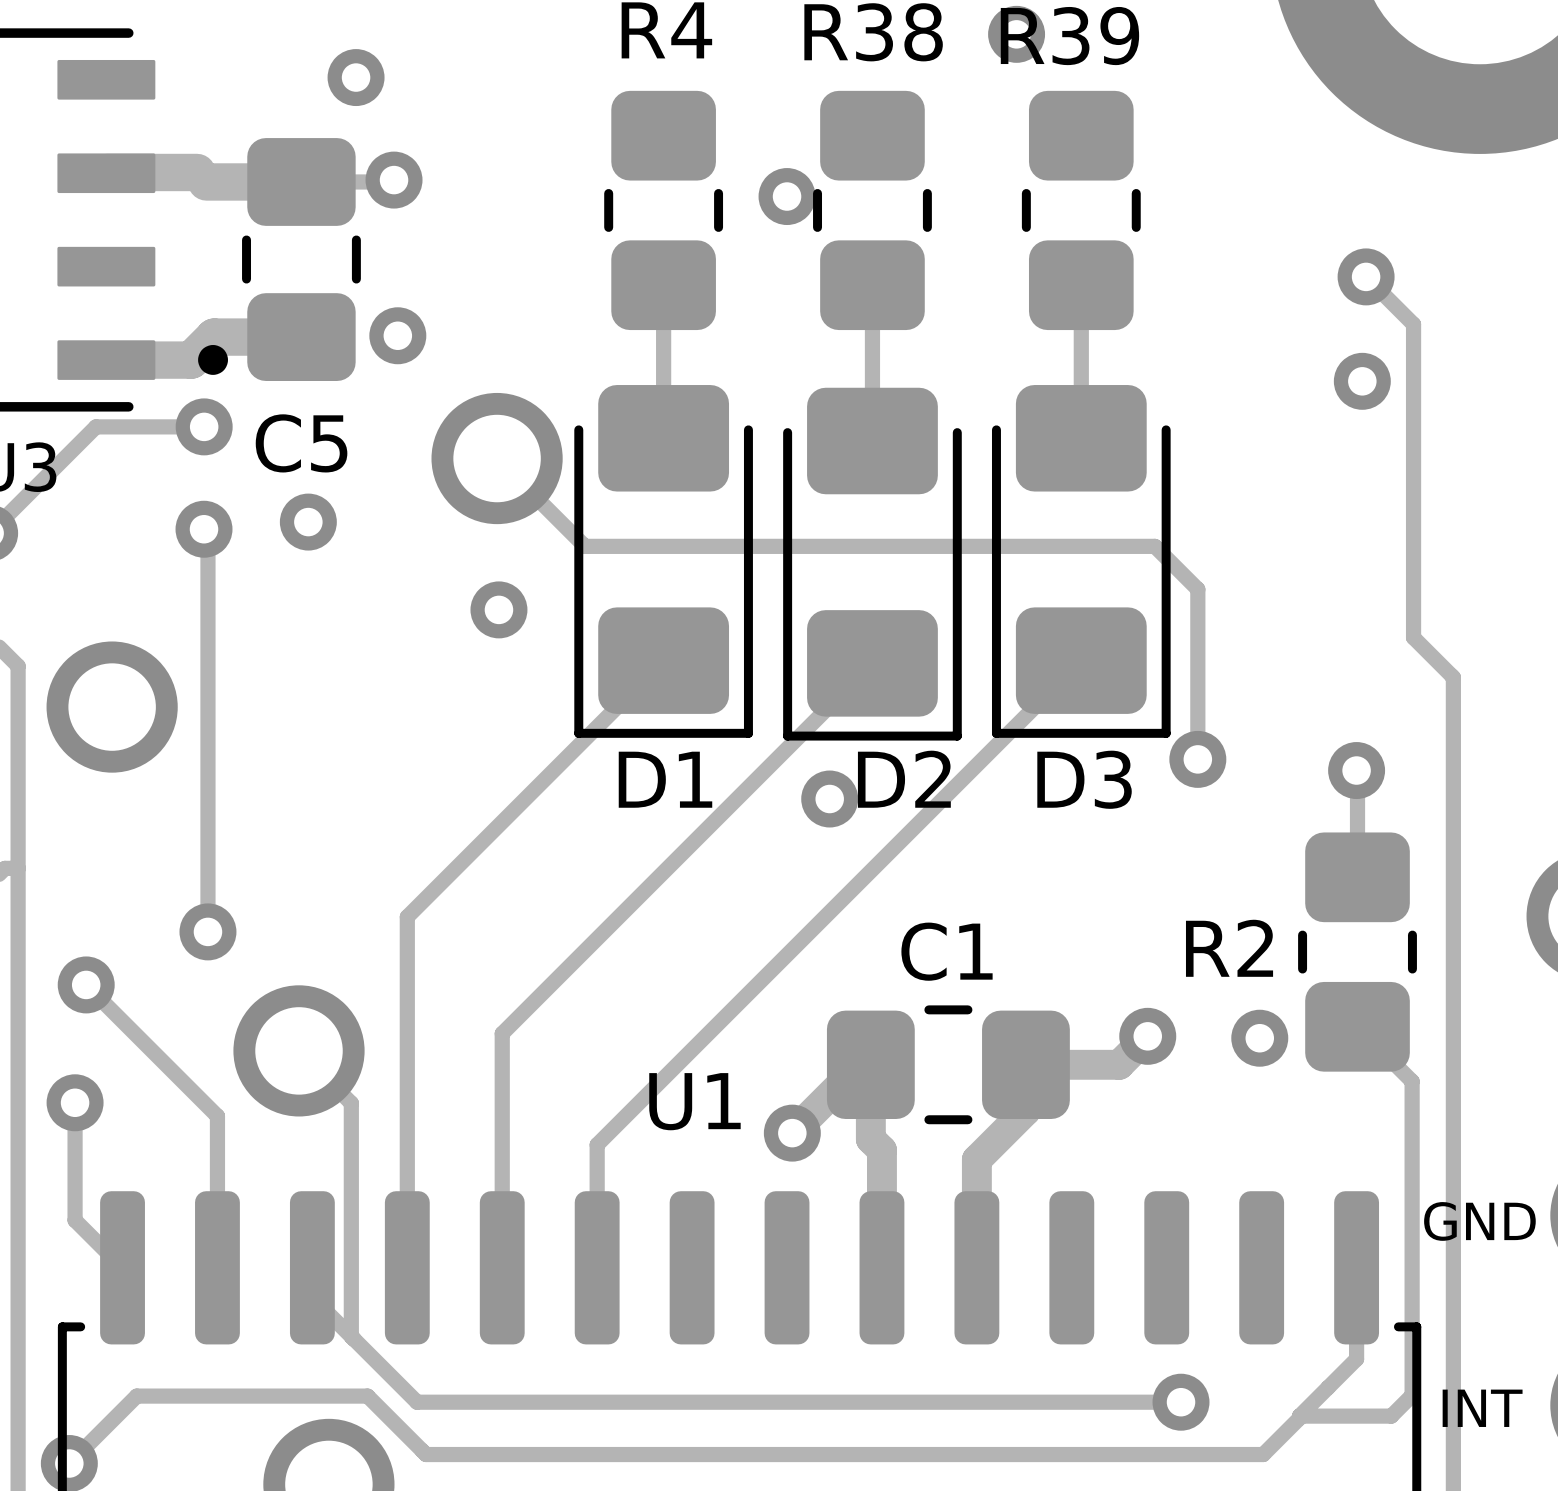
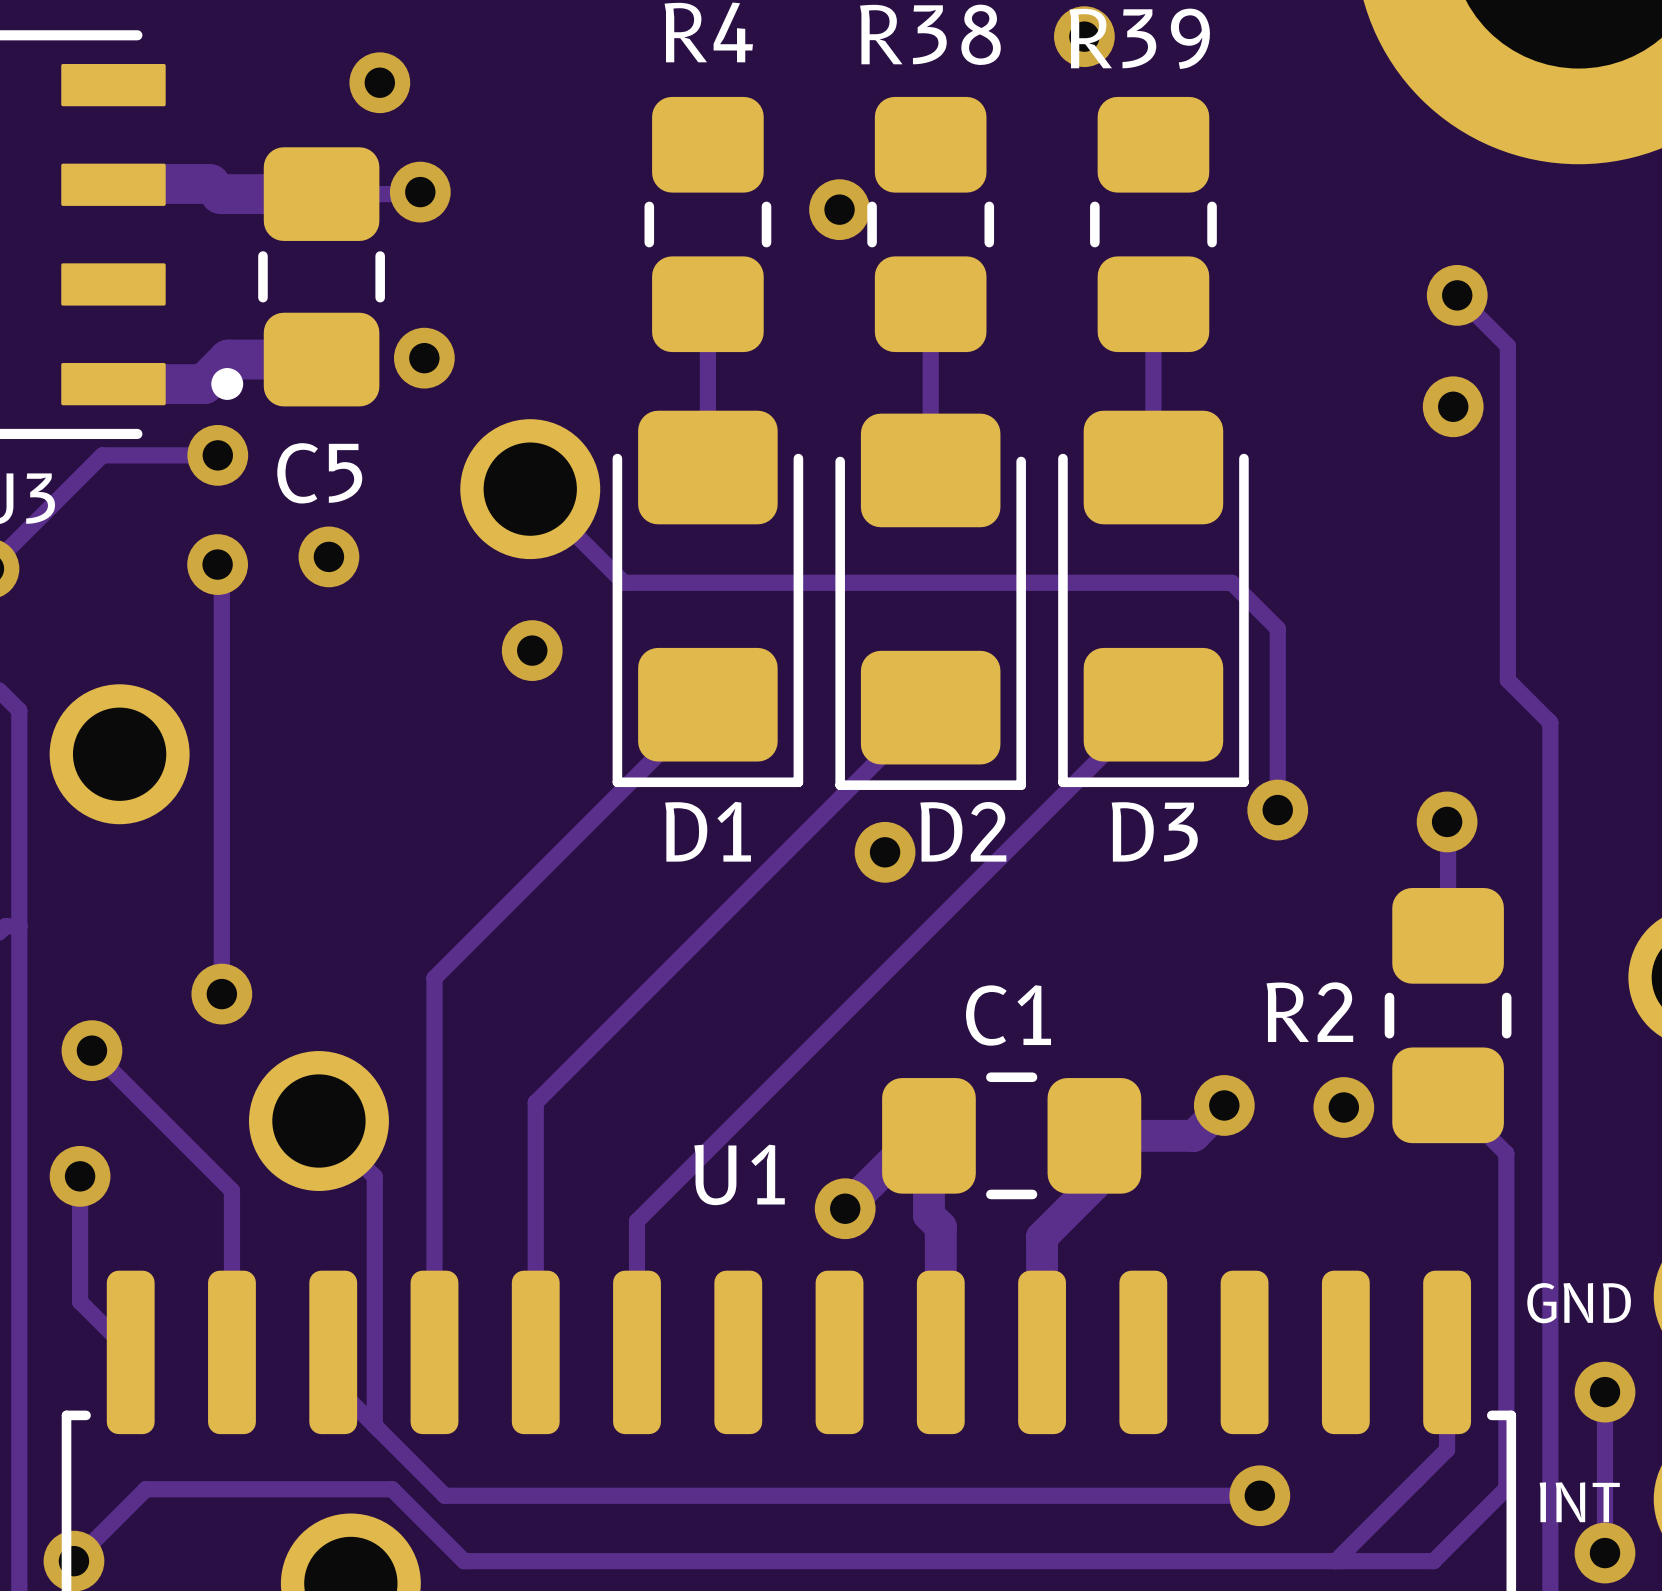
track: none -> (1604, 1392) (1604, 1553)
via: none -> (1604, 1392)
track: none -> (1386, 1510) (1335, 1561)
track: (1391, 1416) (1299, 1416) (1263, 1454) (426, 1454) -> (1484, 1510) (1433, 1561) (464, 1561) (454, 1551)
via: none -> (1604, 1553)

